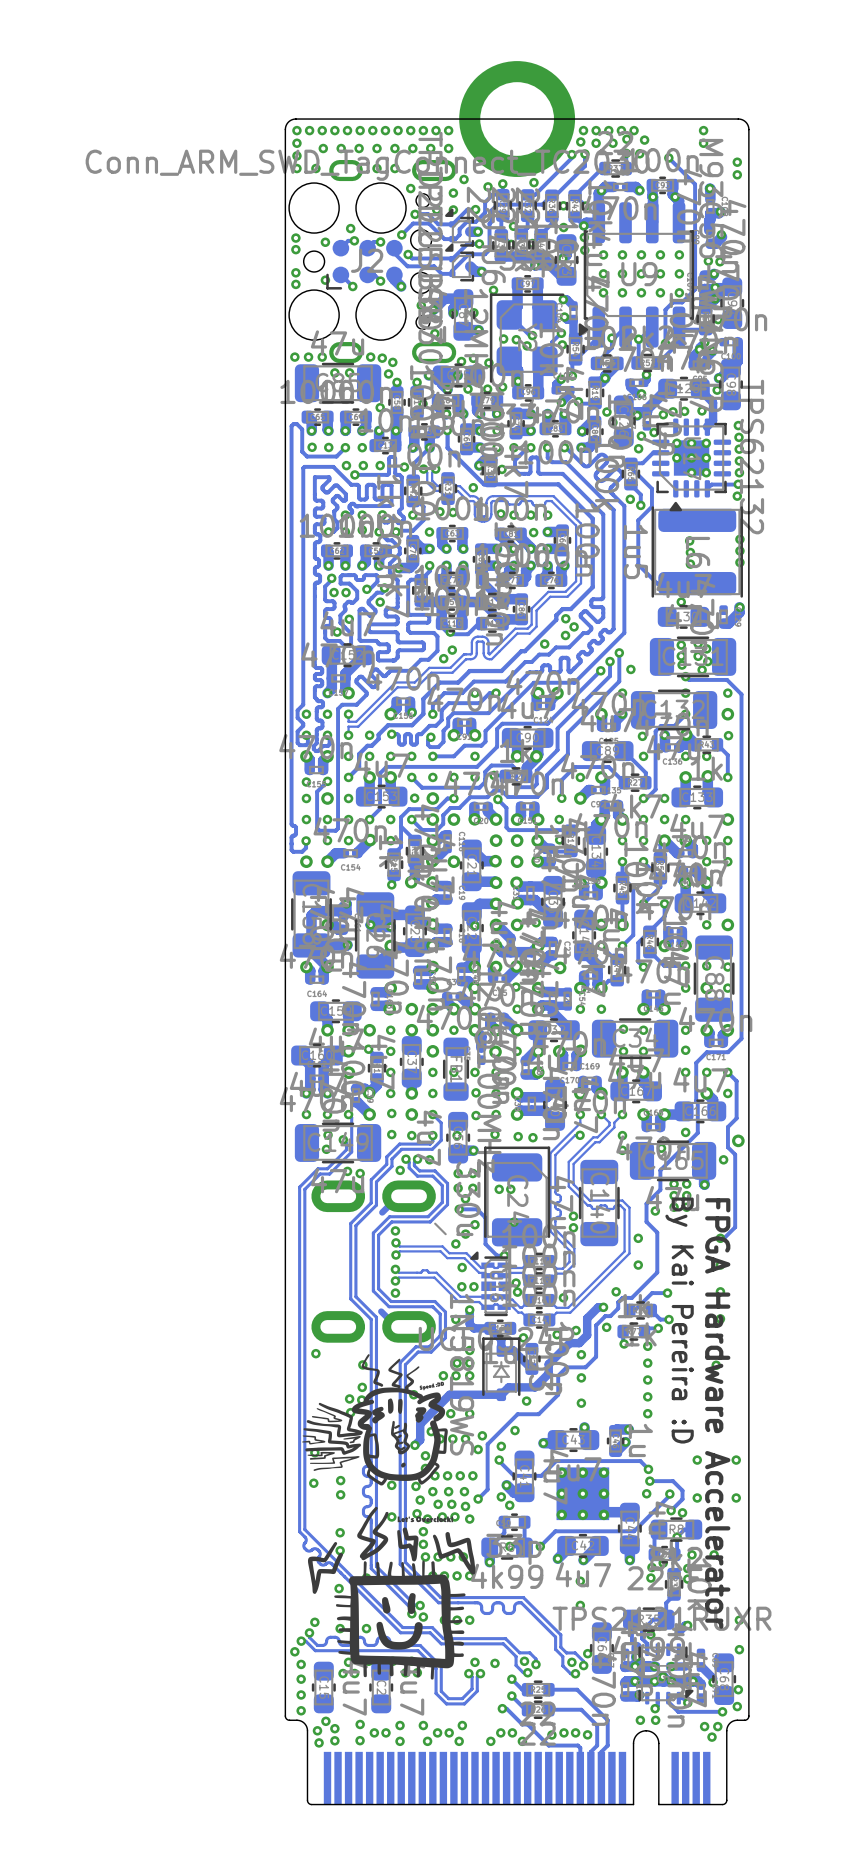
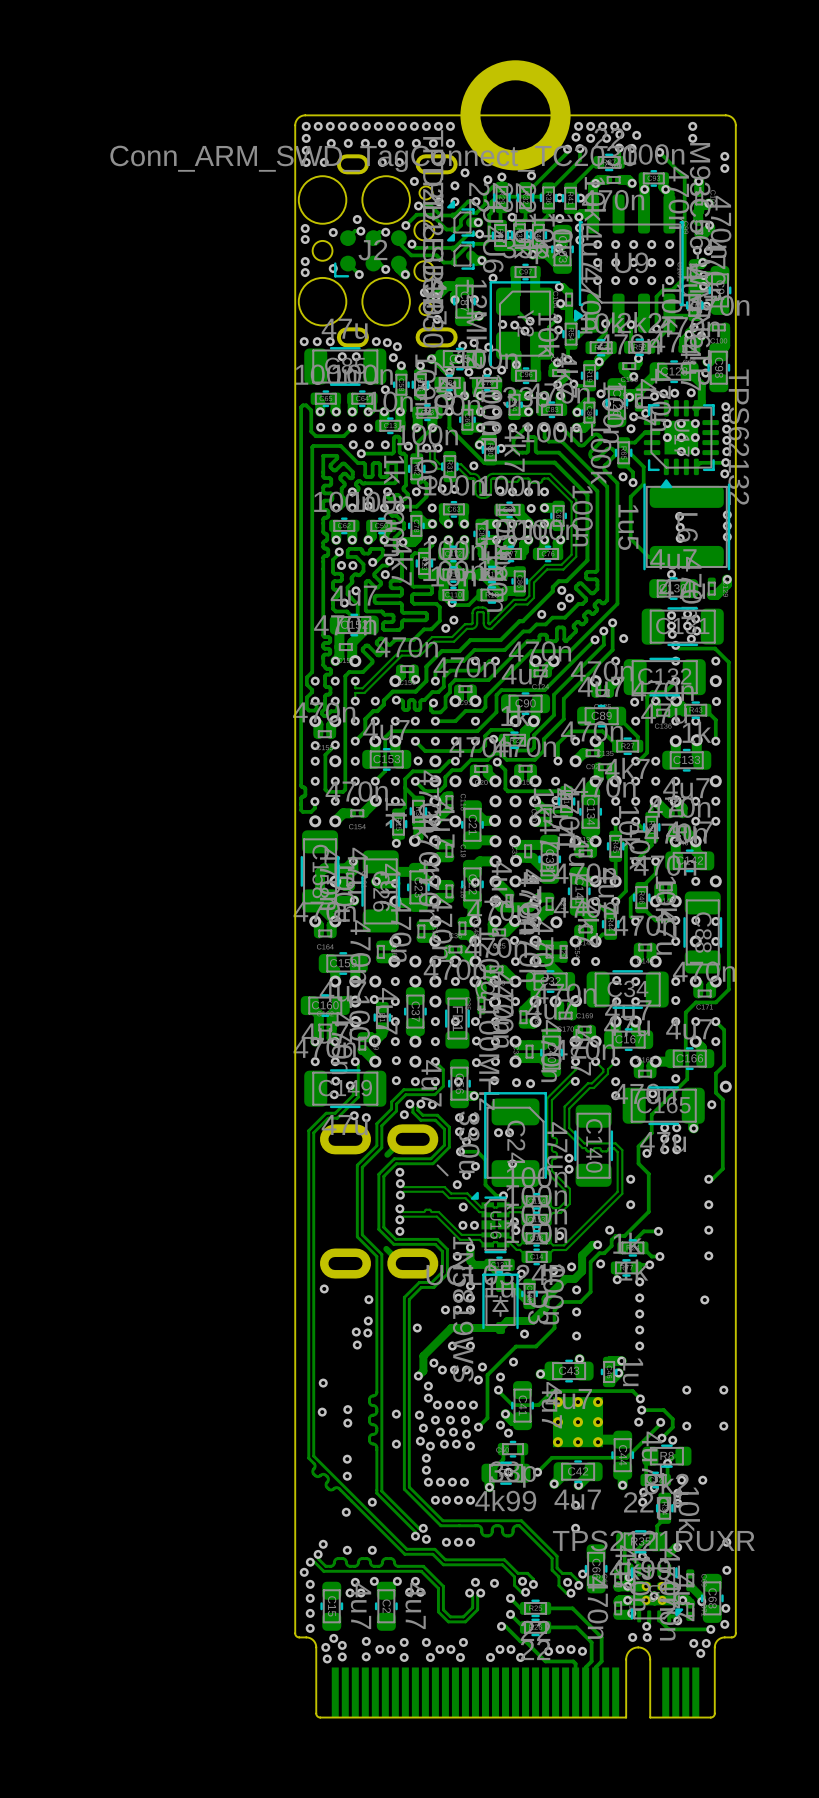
text: By Kai Pereira :D (679, 1320) -> none
drawing: [302, 1354, 476, 1680] -> none
text: FPGA Hardware Accelerator (717, 1413) -> none

